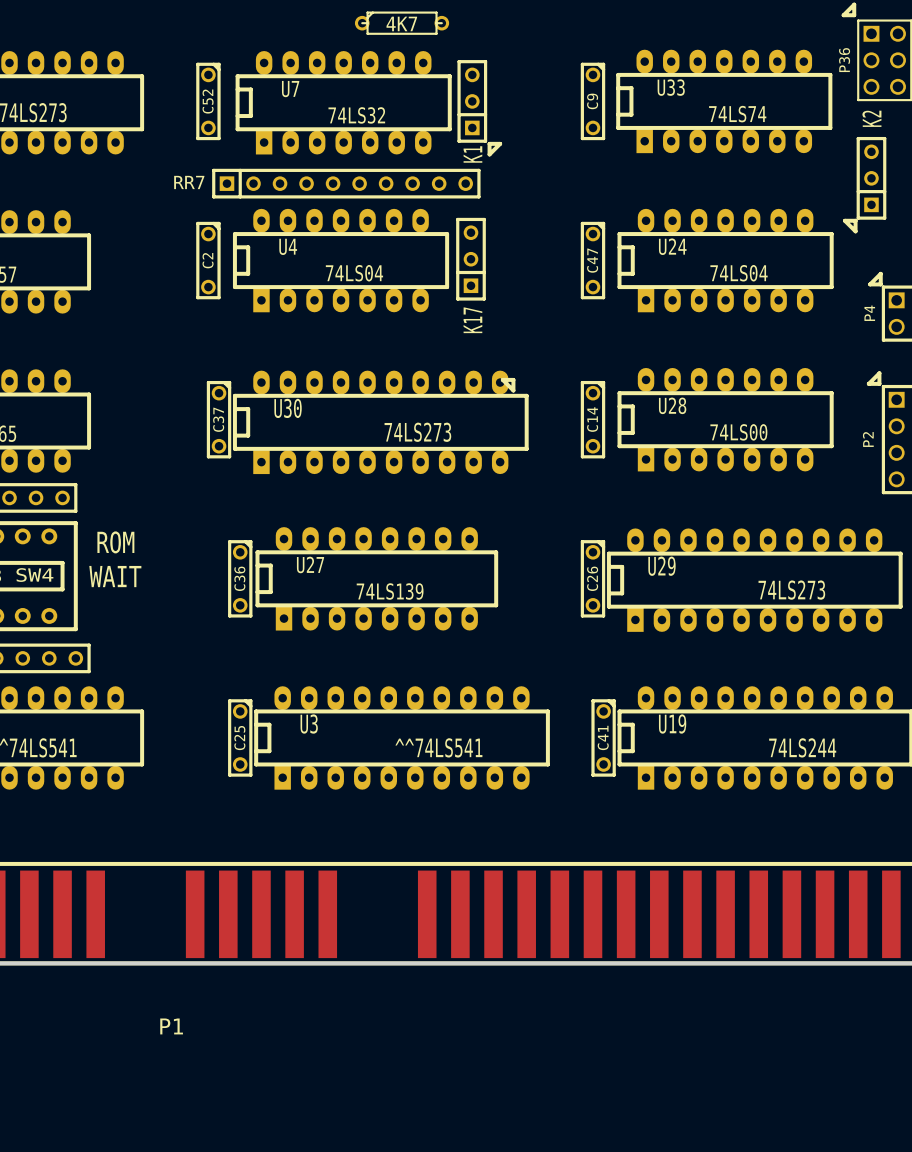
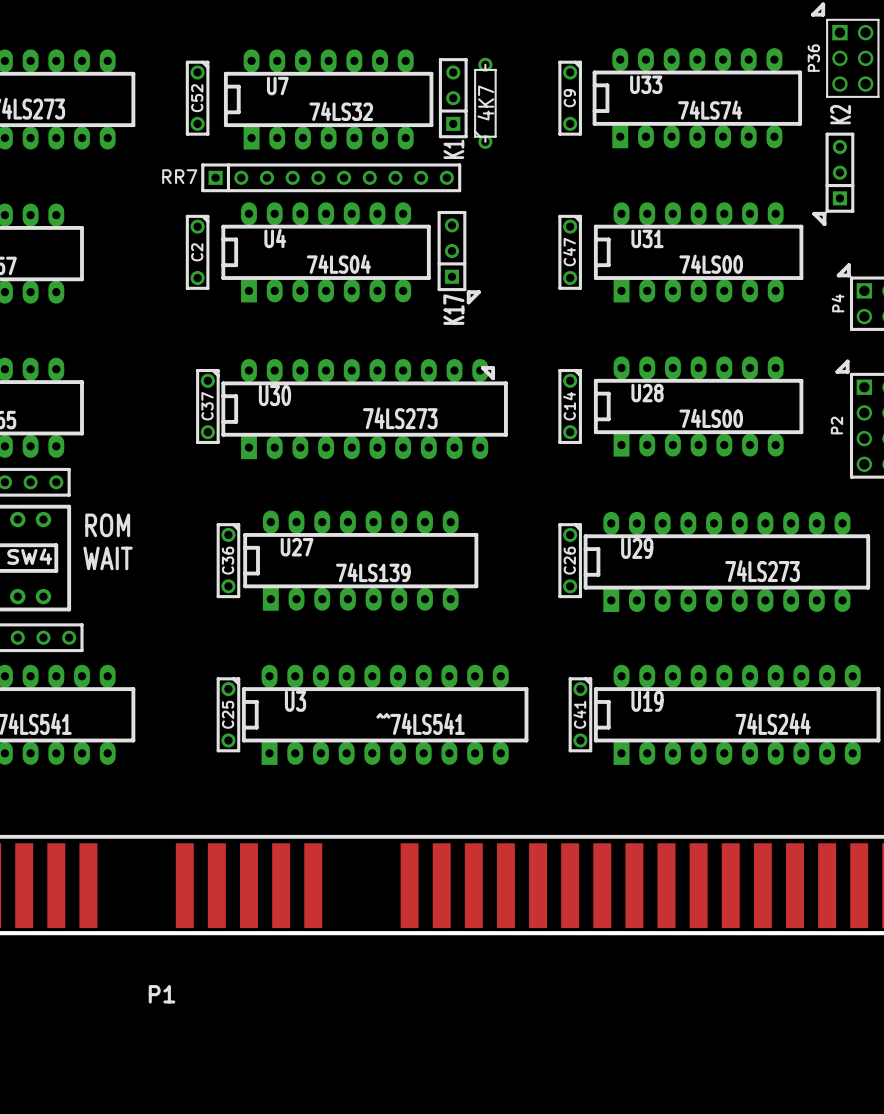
part rotation: 0° (402, 23) -> 90° counterclockwise (485, 103)
part position: (402, 23) -> (485, 103)
line: (489, 143) (500, 143) (489, 154) (489, 143) -> (468, 292) (478, 292) (468, 302) (468, 292)
U24 name: U24 (672, 246) -> U31 (647, 238)
U24 value: 74LS04 (739, 273) -> 74LS00 (711, 264)

